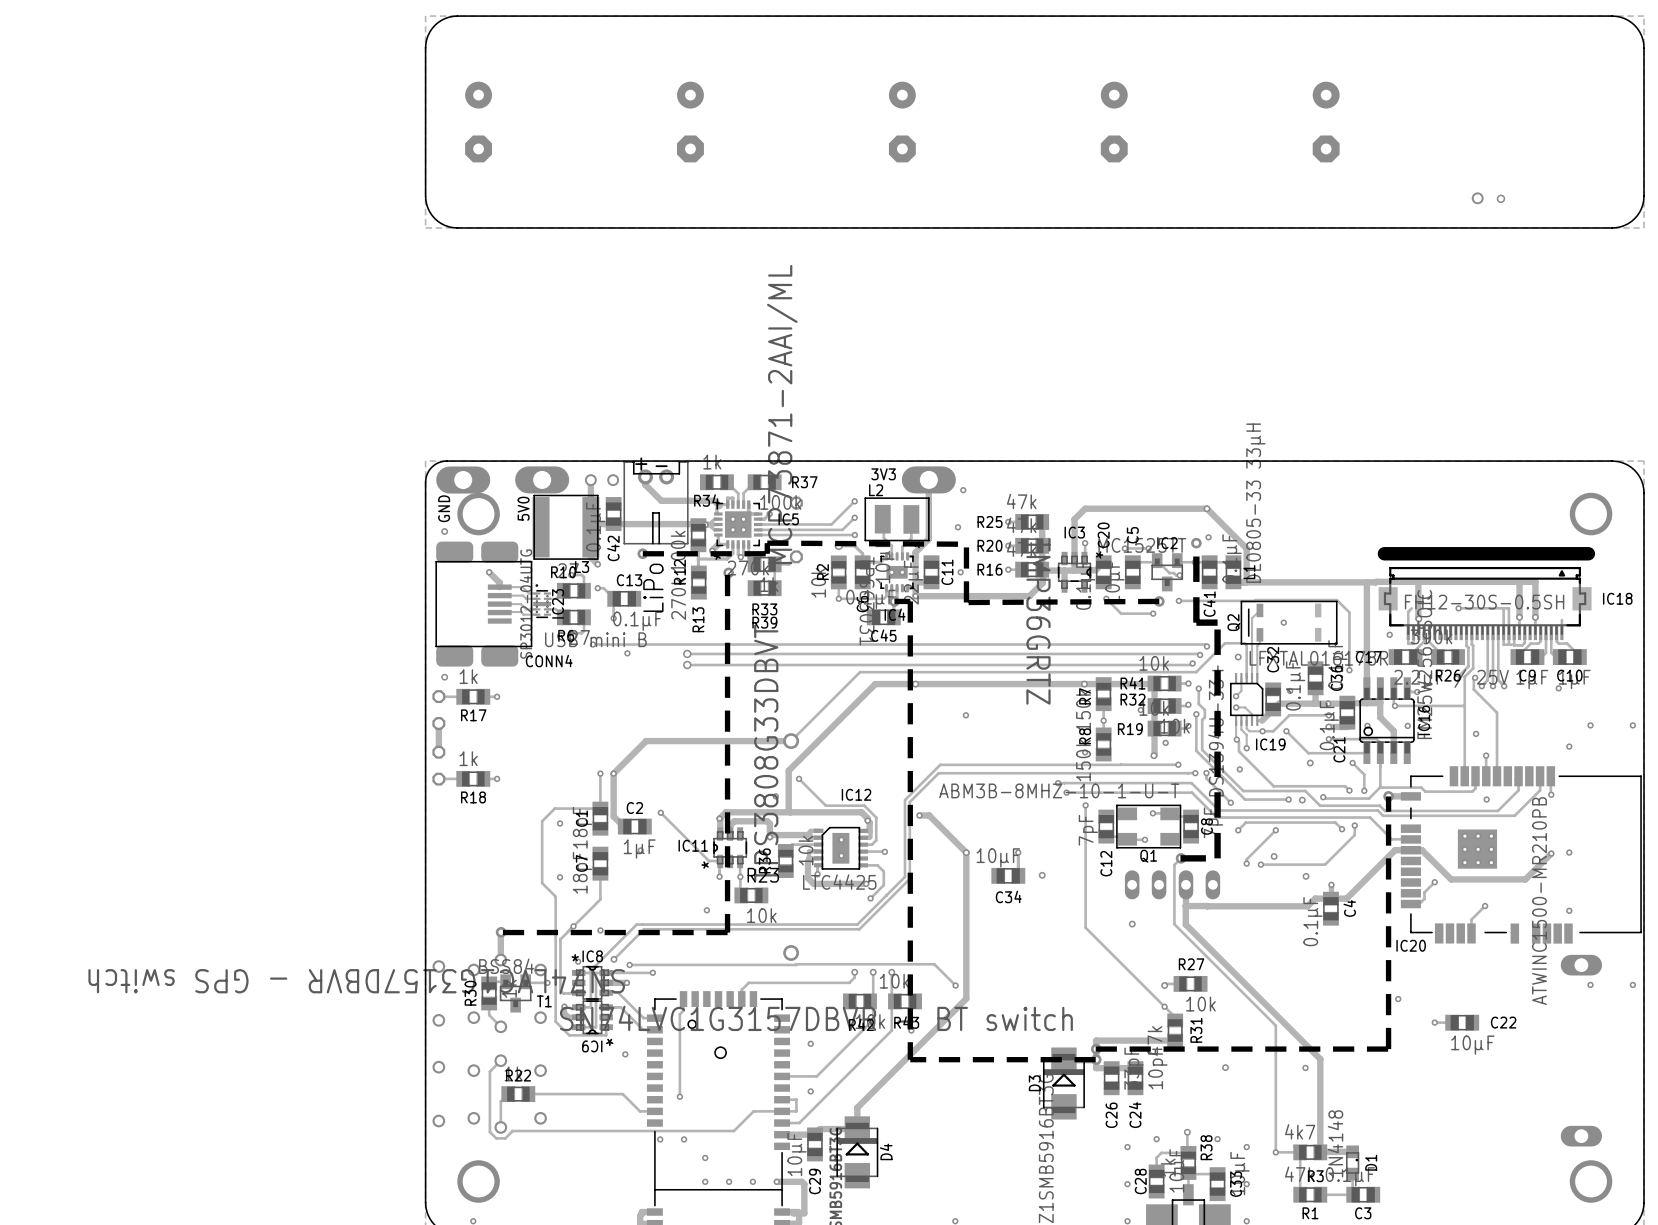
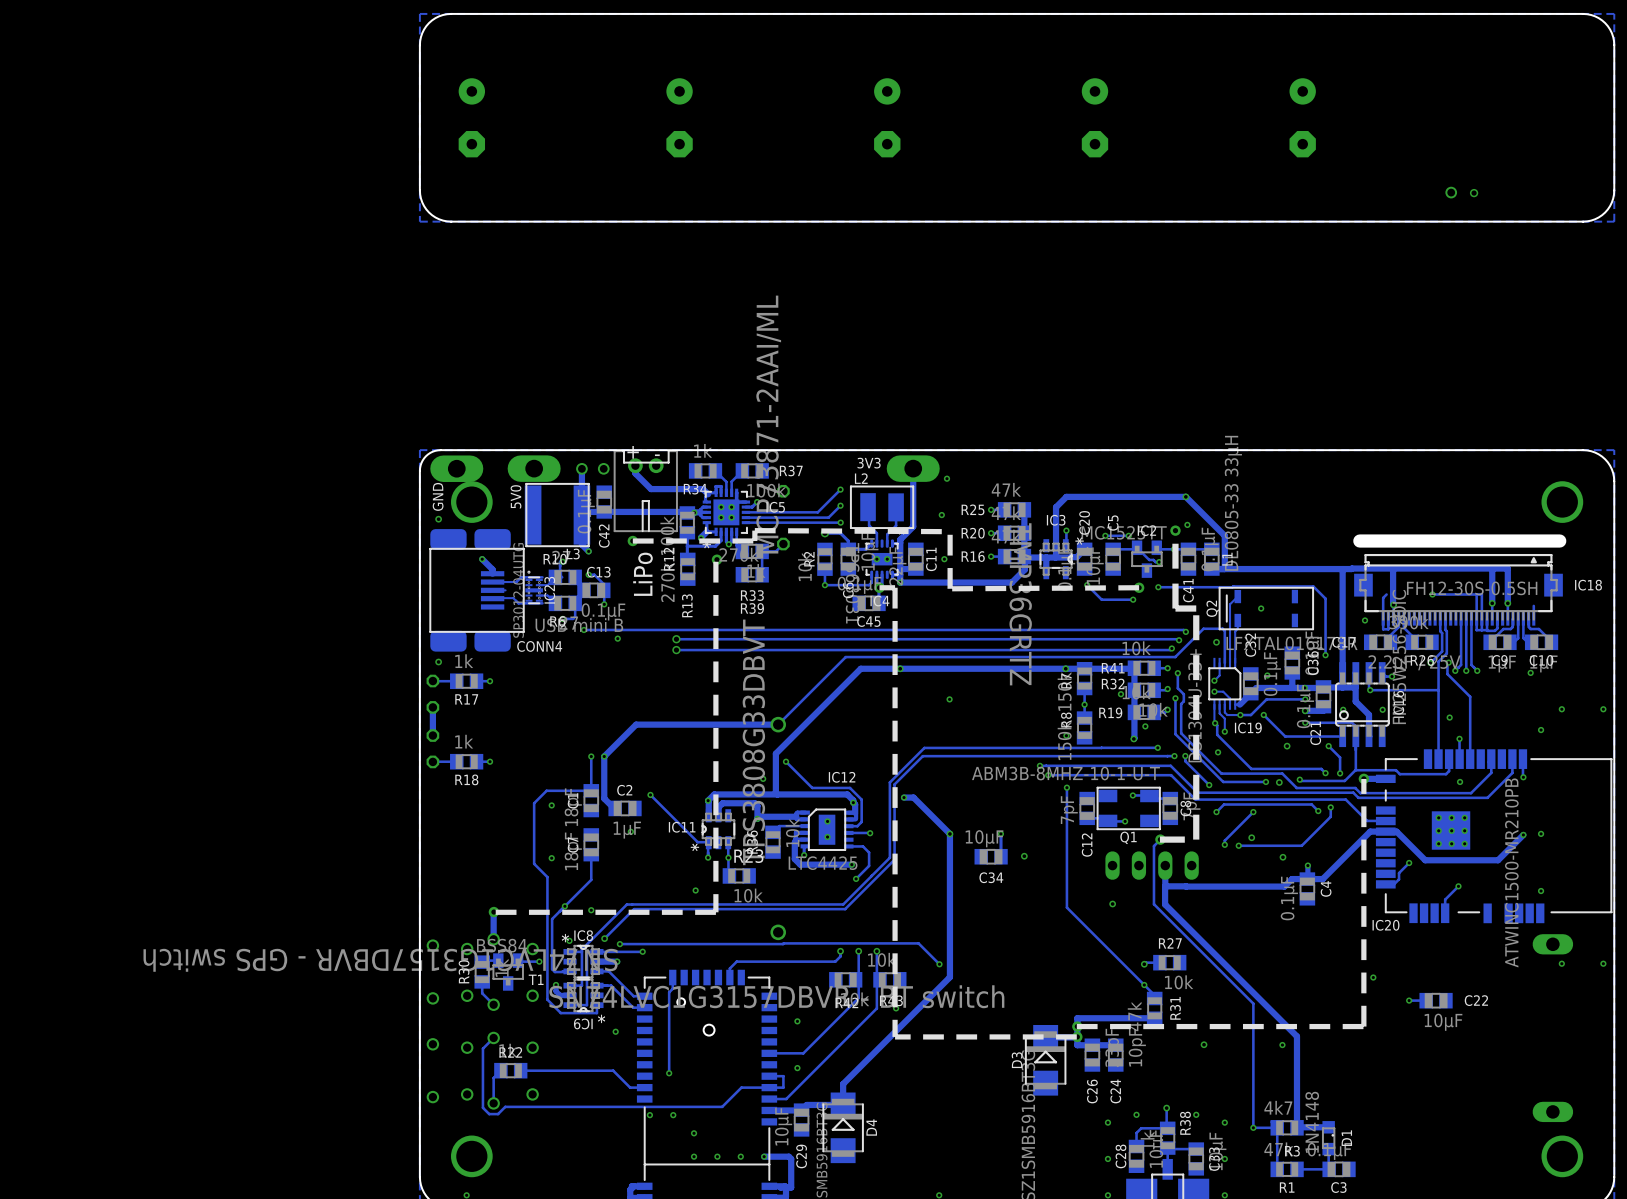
track: none -> (560, 561) (560, 575) (562, 577)
track: (571, 574) (581, 574) (583, 577) (583, 590) -> none
track: (499, 587) (522, 587) (528, 593) (536, 593) -> none
track: (523, 595) (526, 598) (536, 598) -> (515, 582) (521, 577) (542, 577)
C13 position: (624, 598) -> (593, 590)
track: (513, 604) (520, 604) (526, 609) (536, 609) -> none
track: (536, 614) (523, 614) -> (542, 603) (518, 603) (515, 600)

